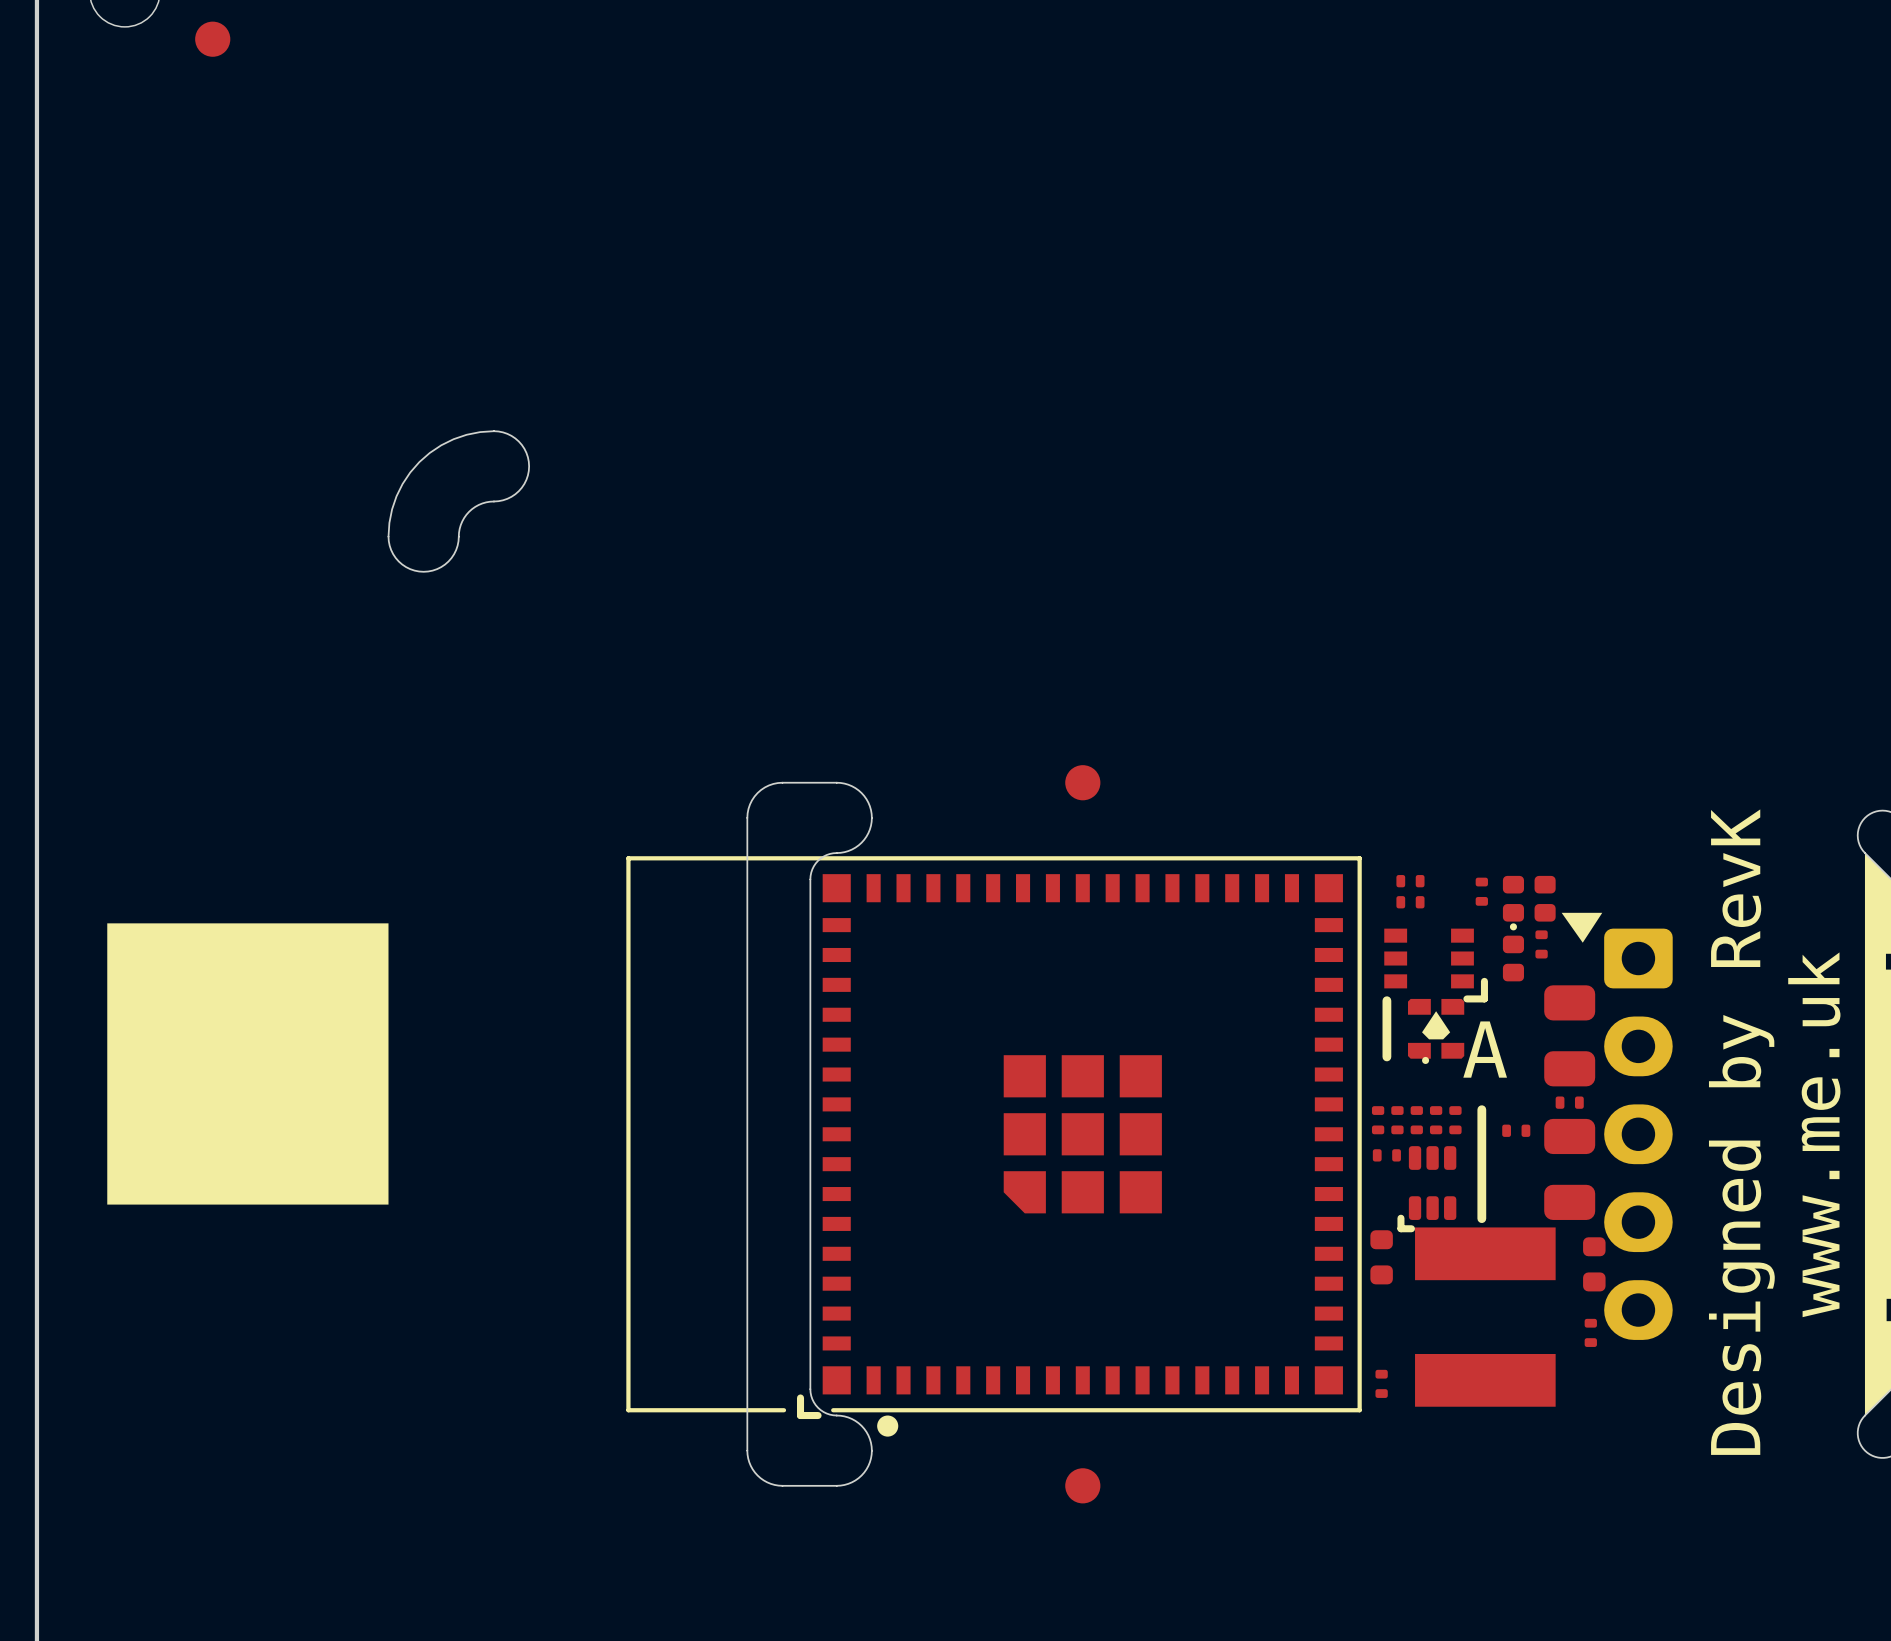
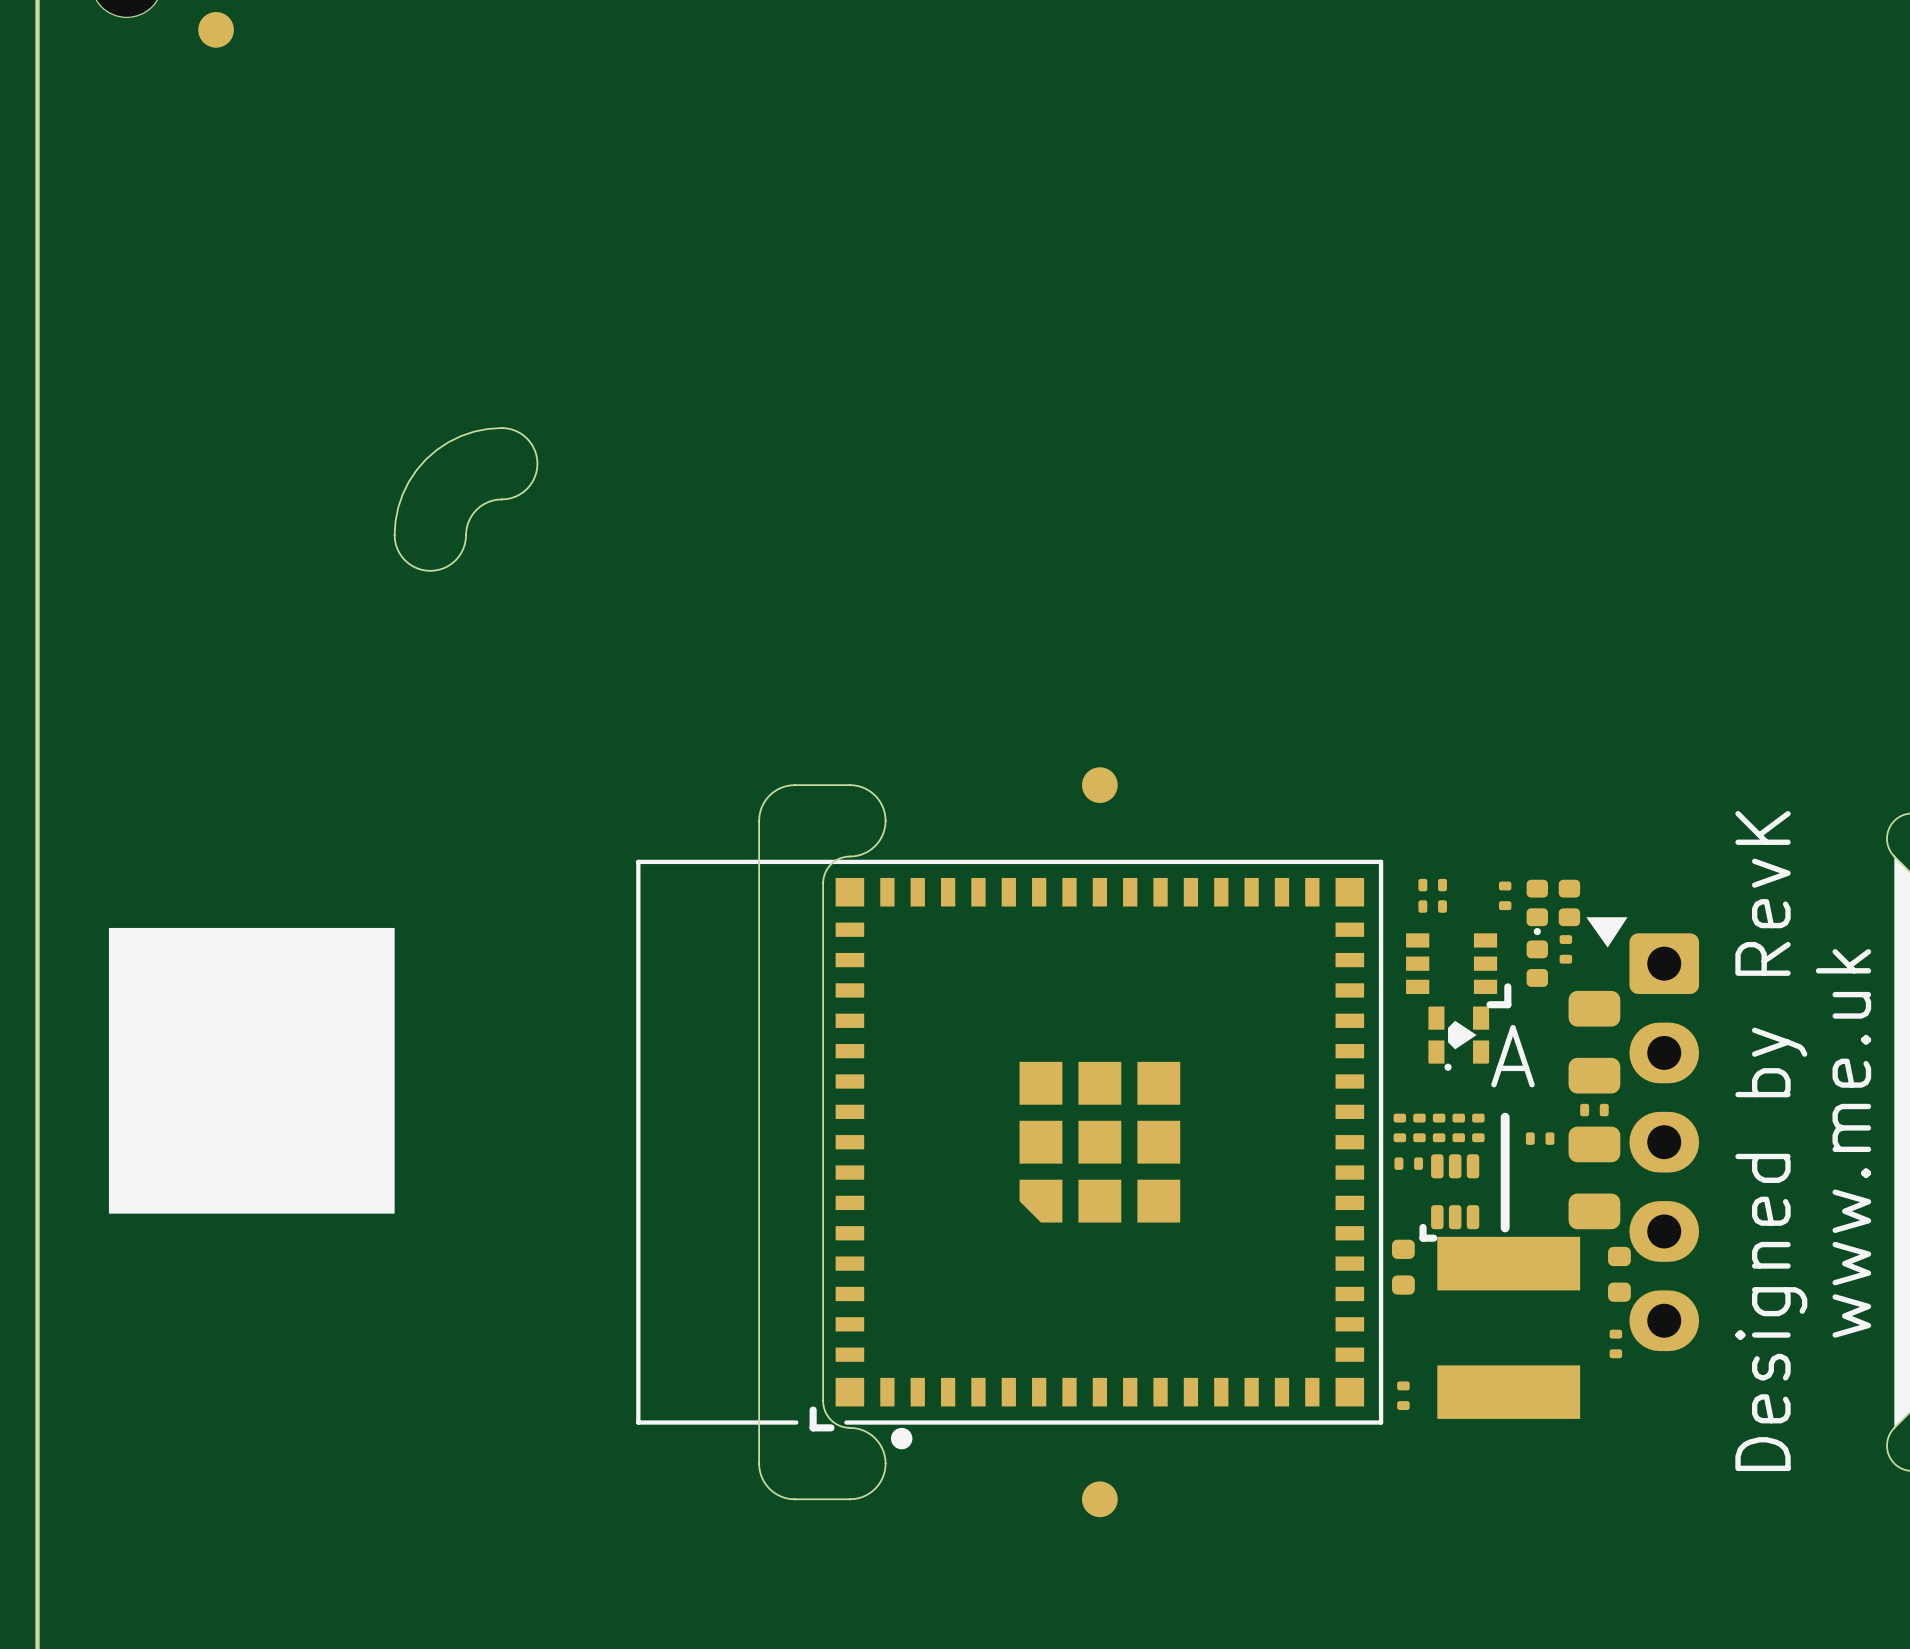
part footprint: [1407, 998, 1465, 1059] -> [1428, 1006, 1490, 1064]
line: (1386, 1000) (1386, 1056) -> none

